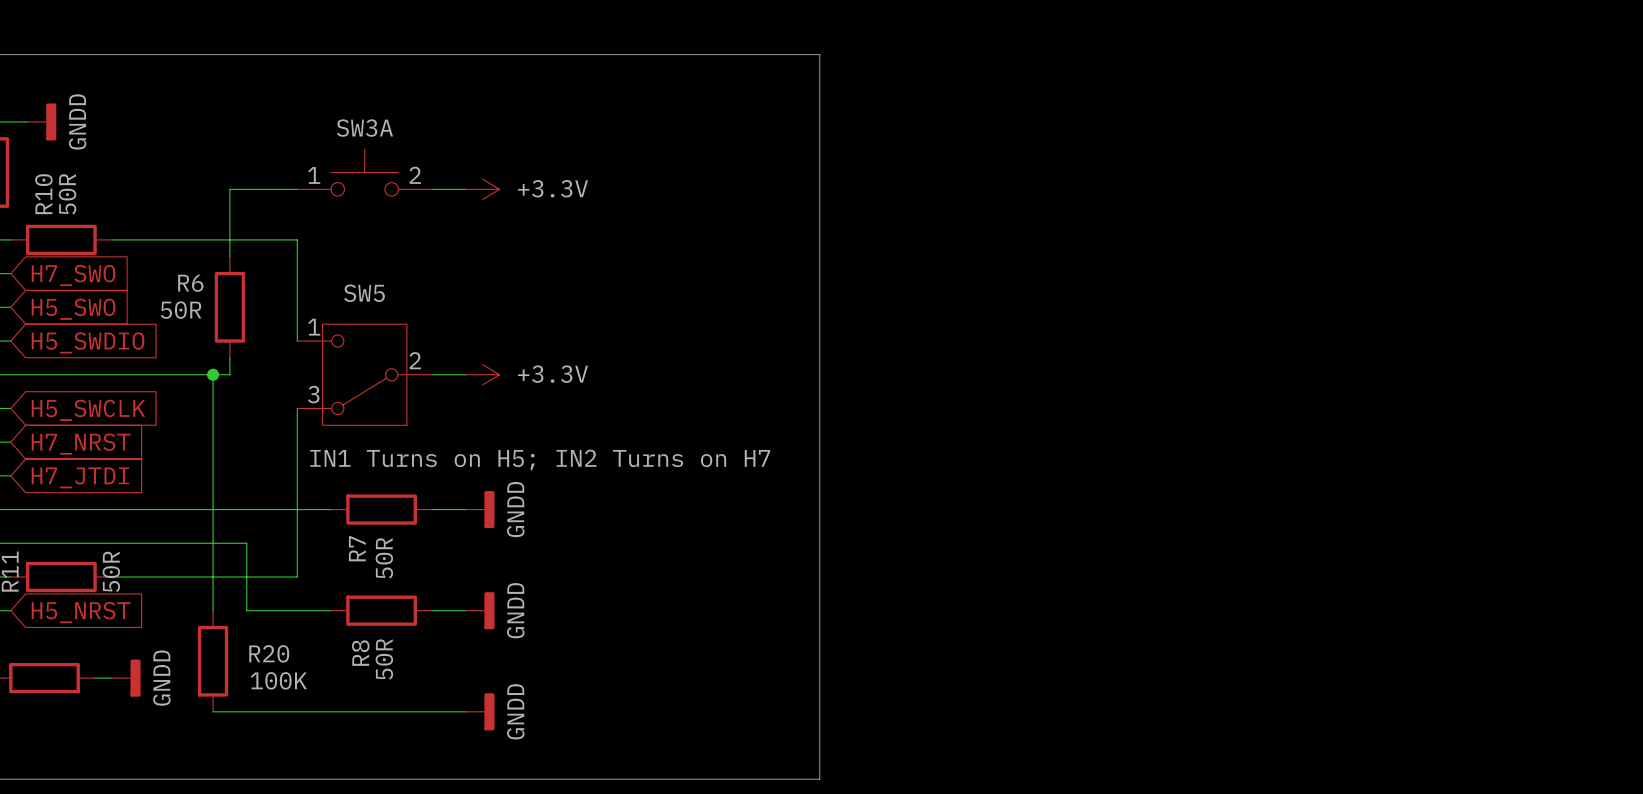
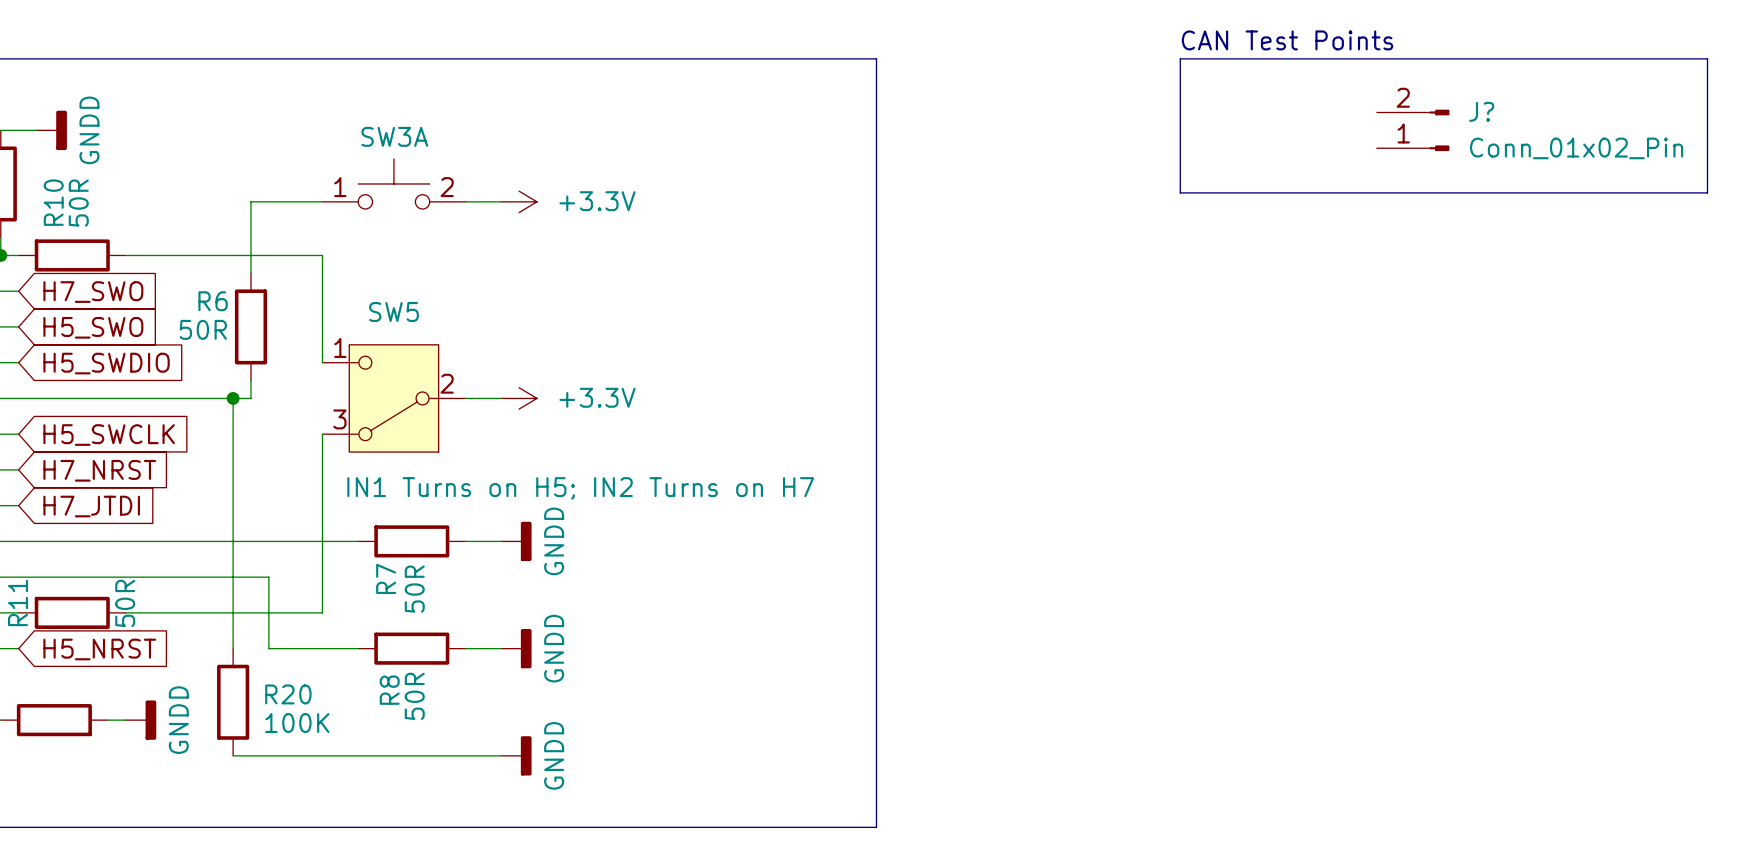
text: none -> CAN Test Points (1287, 40)
line: none -> (1180, 58) (1707, 58) (1707, 192) (1180, 192) (1180, 58)
J?: none -> Conn_01x02_Pin (1413, 130)

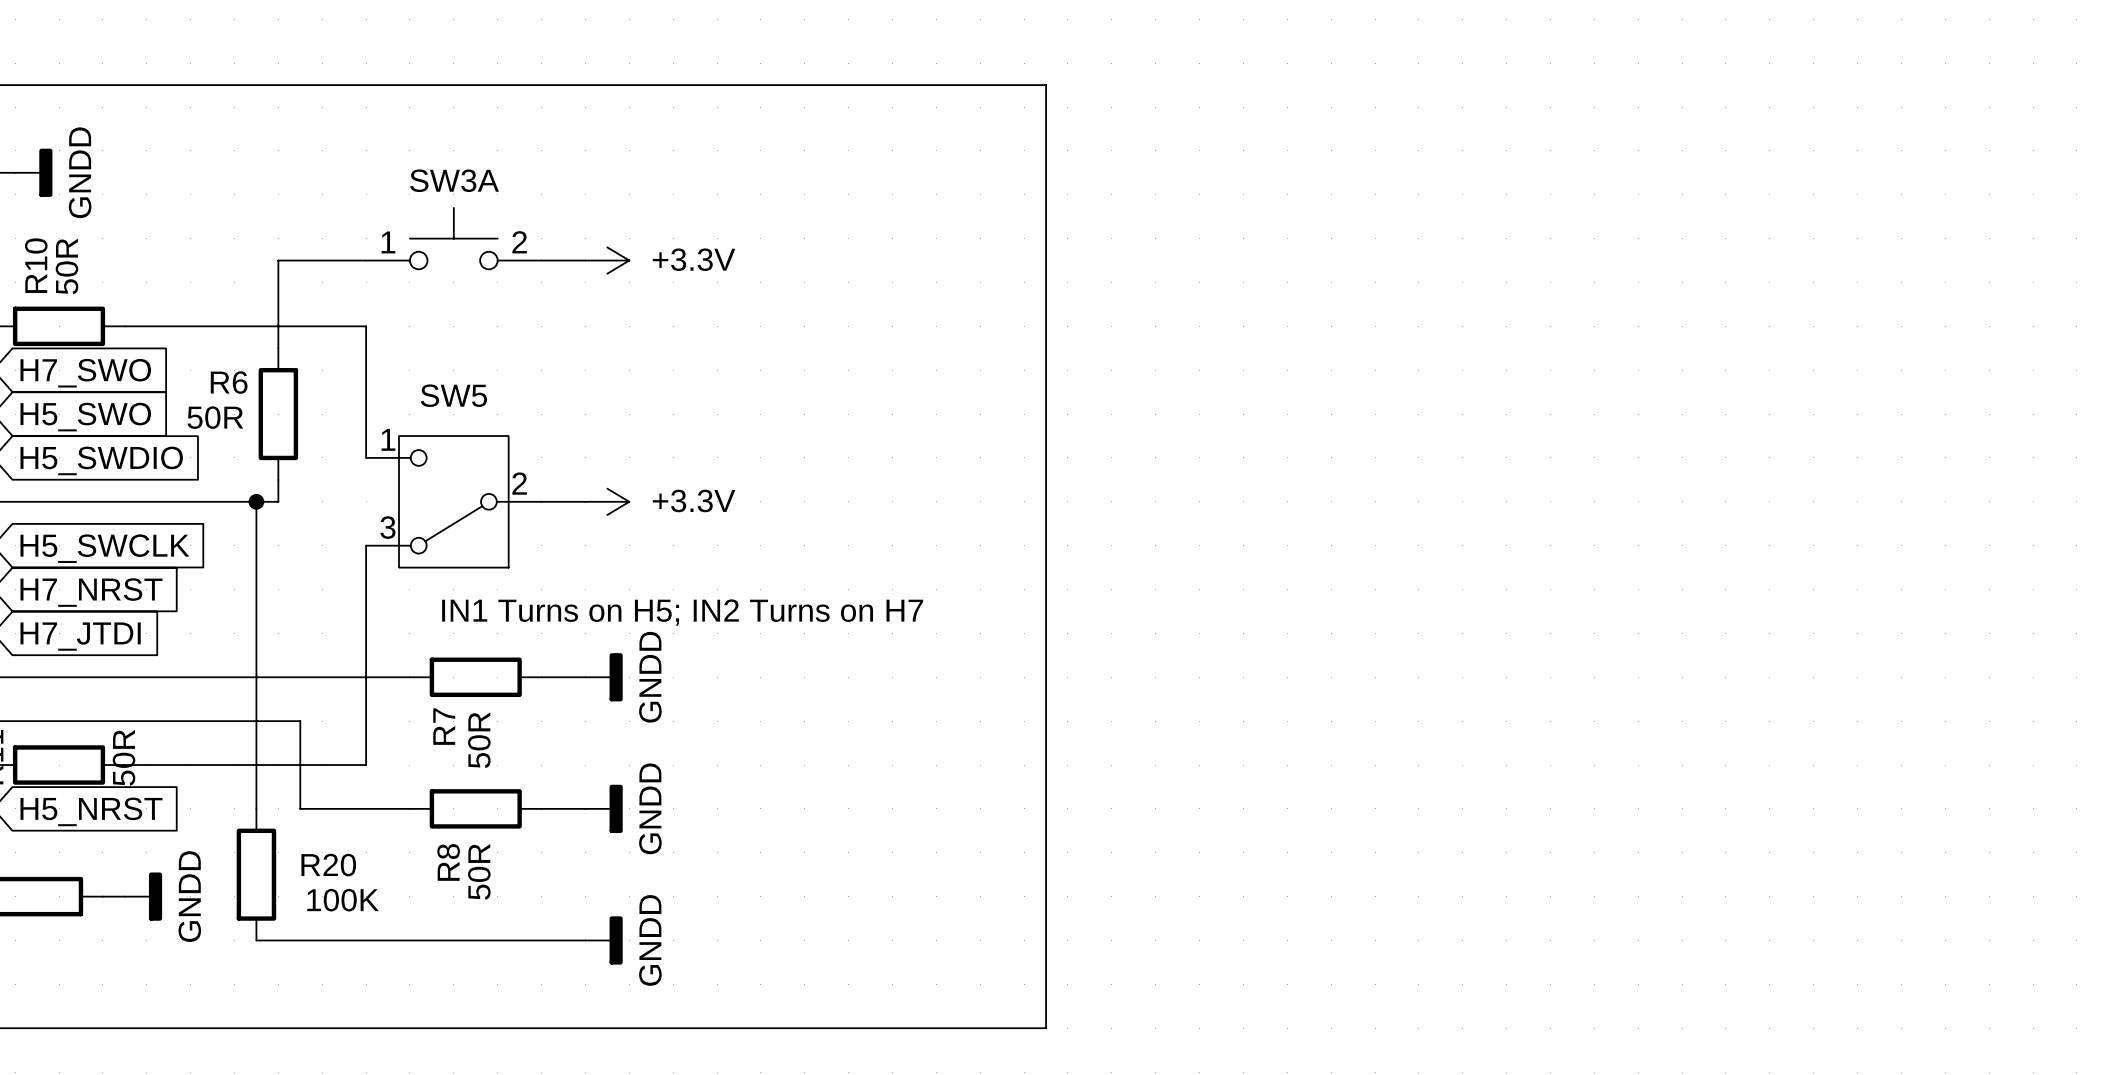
text: CAN Test Points (1287, 40) -> none
line: (1180, 58) (1707, 58) (1707, 192) (1180, 192) (1180, 58) -> none
J?: Conn_01x02_Pin (1413, 130) -> none

